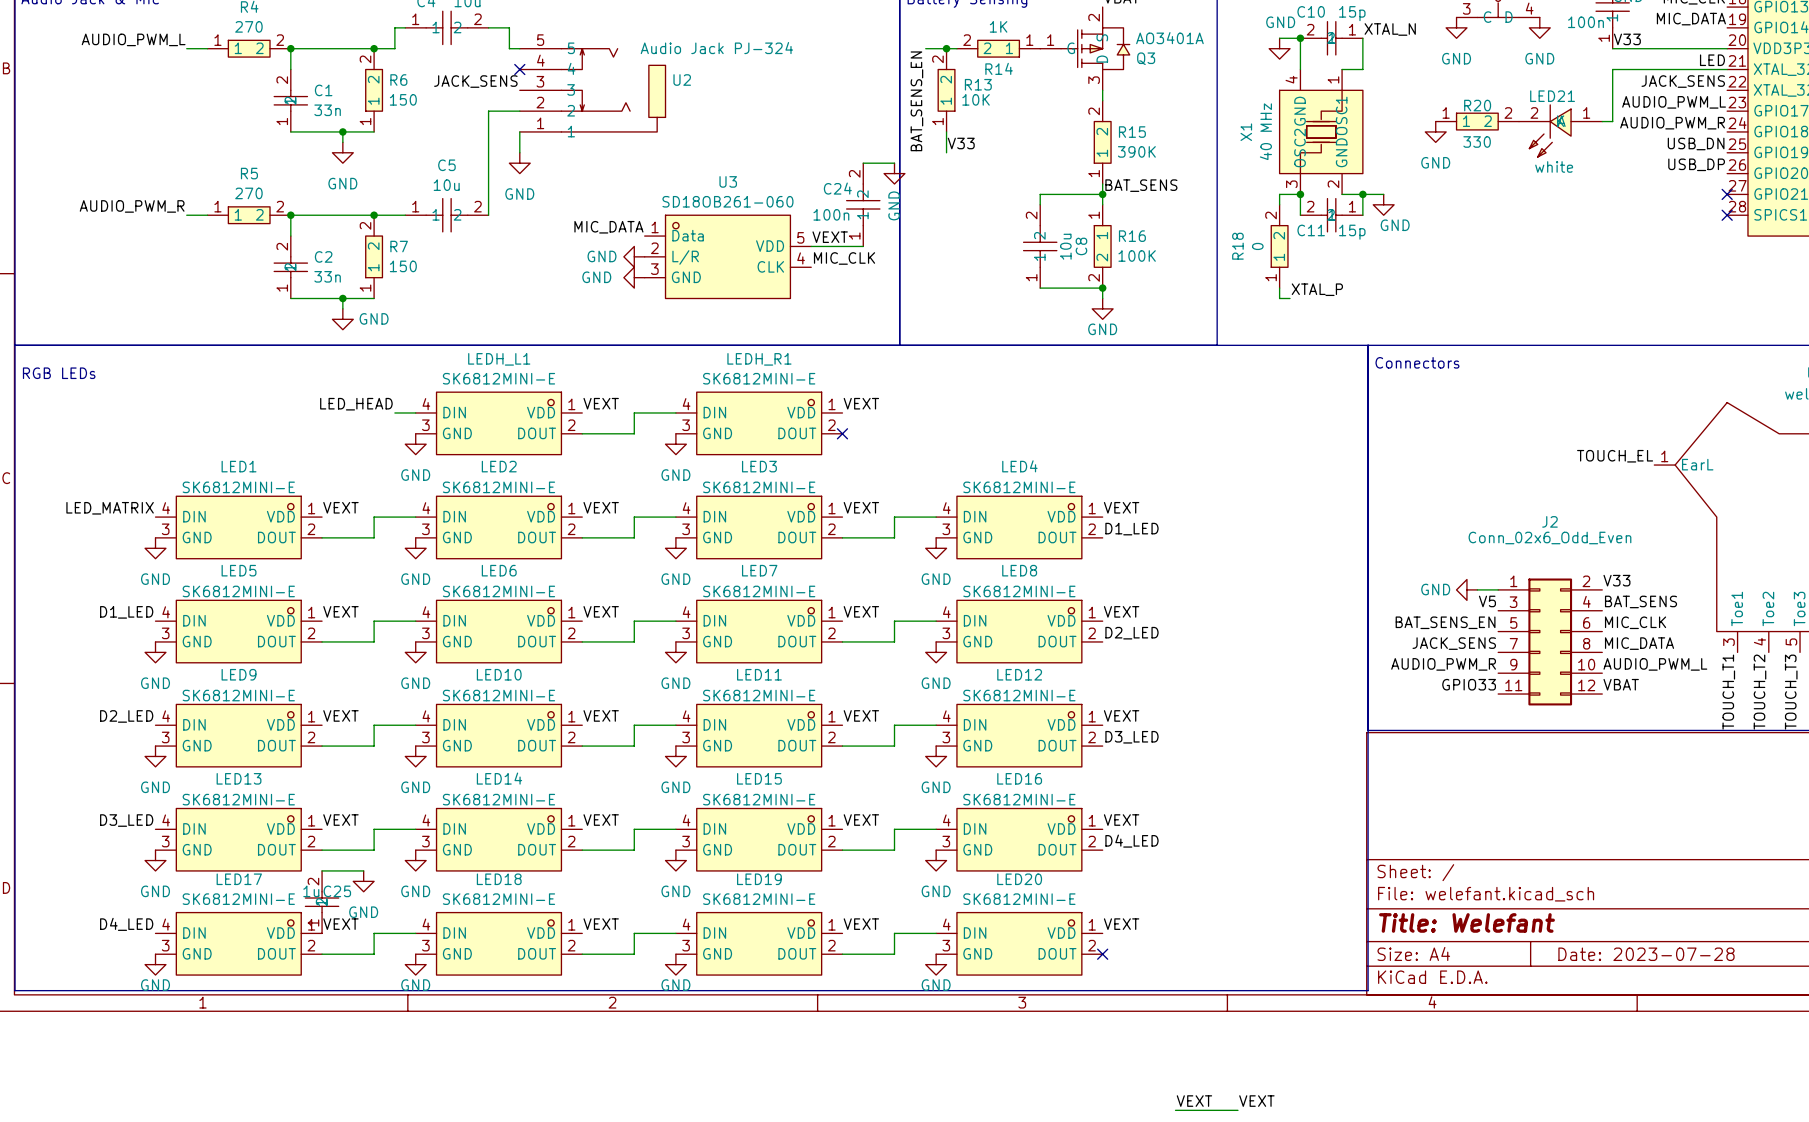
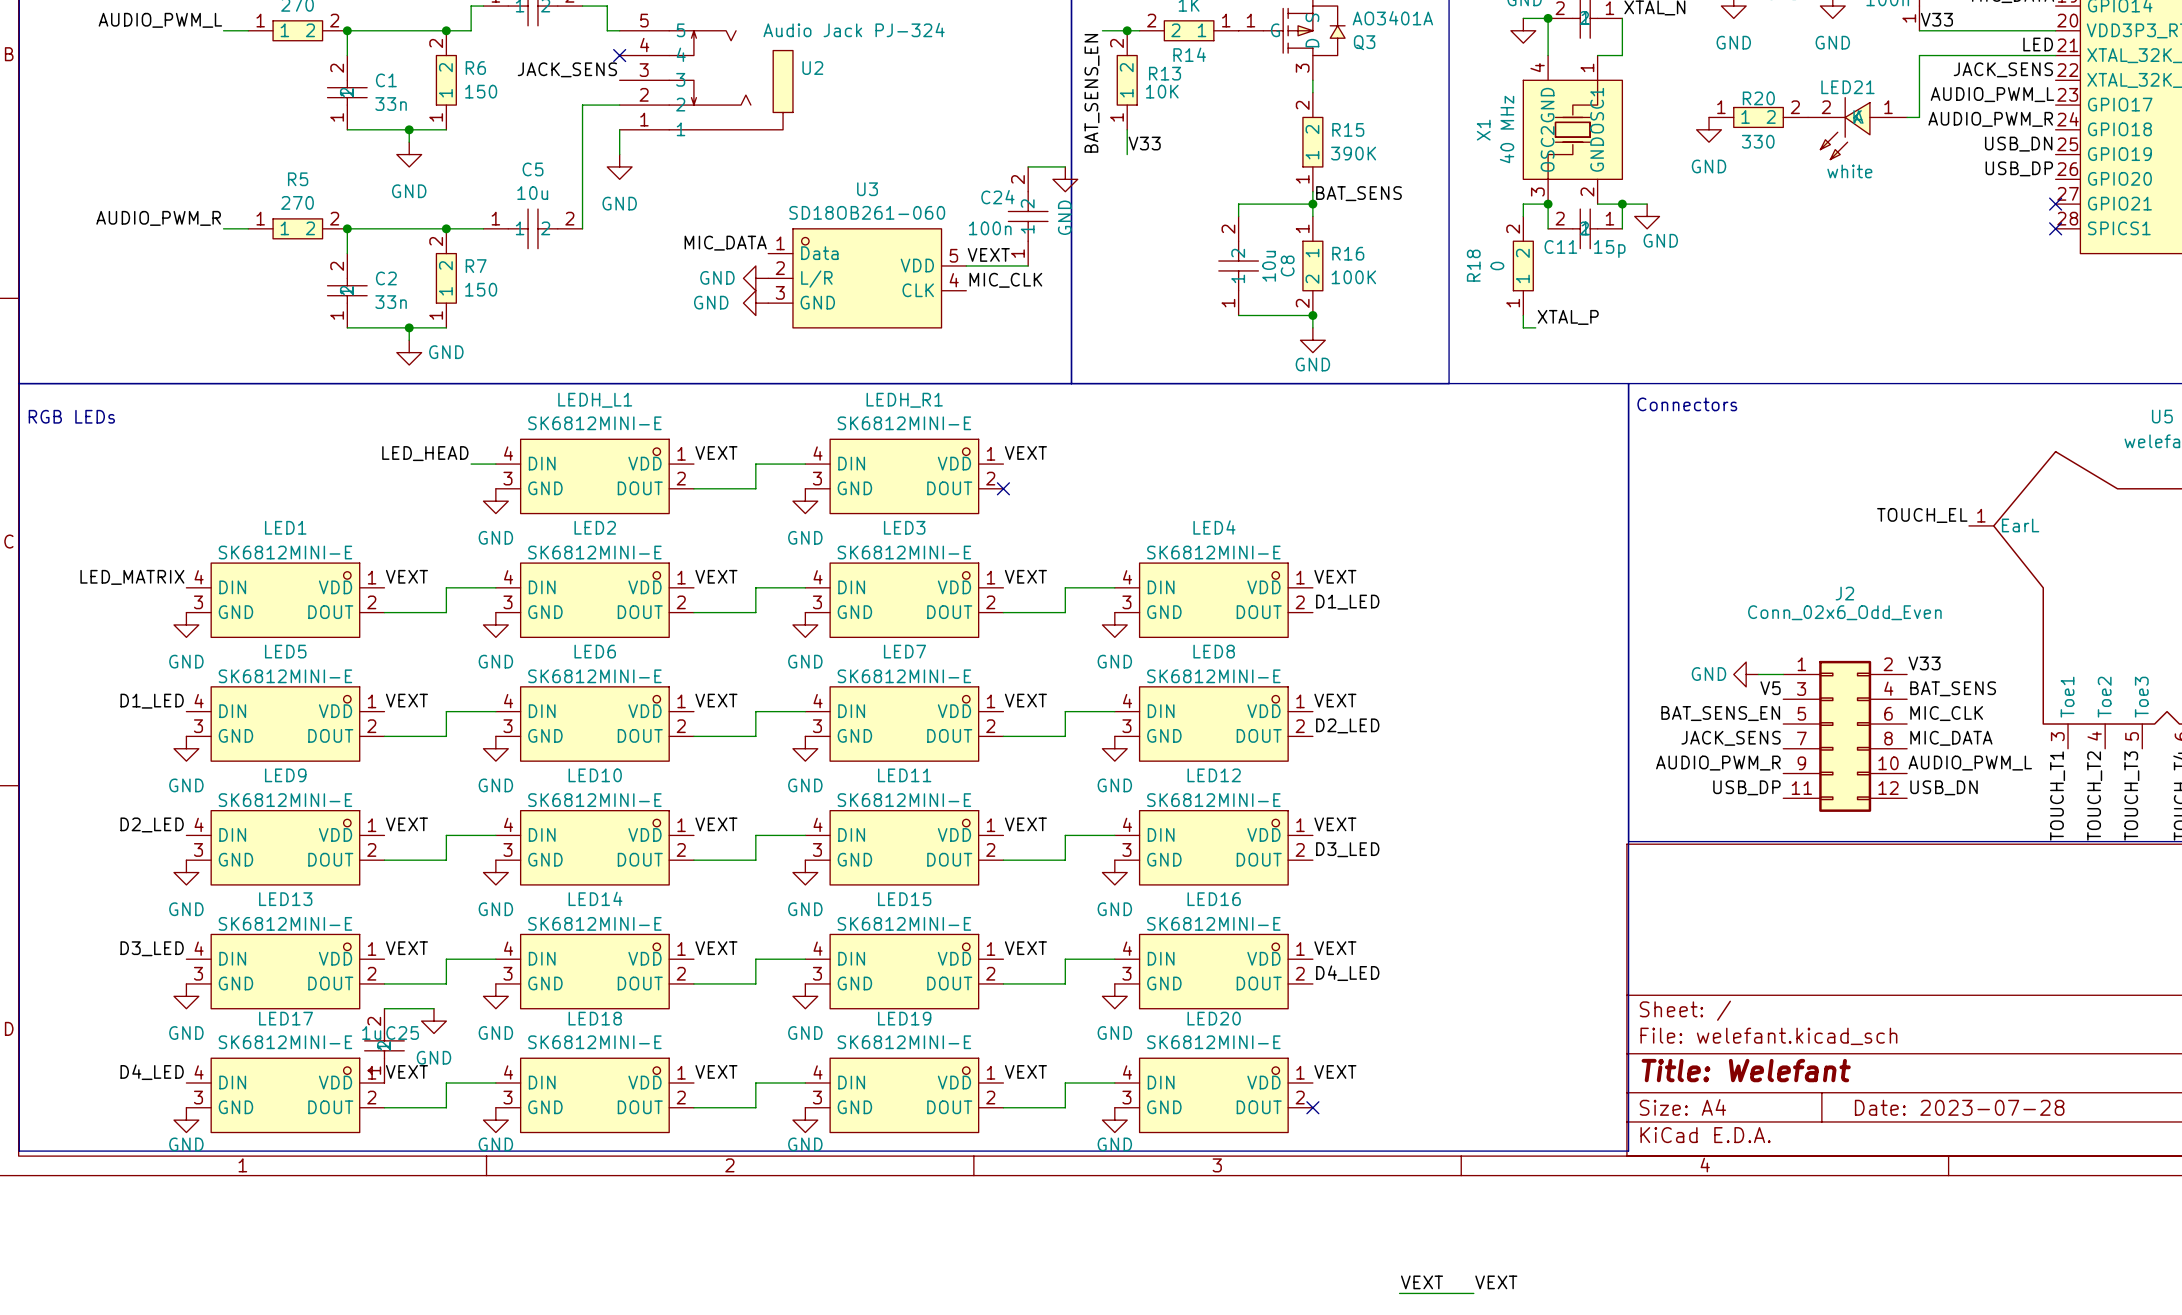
label: GPIO33 (1469, 684) -> USB_DP (1746, 787)
label: VBAT (1621, 684) -> USB_DN (1944, 787)

